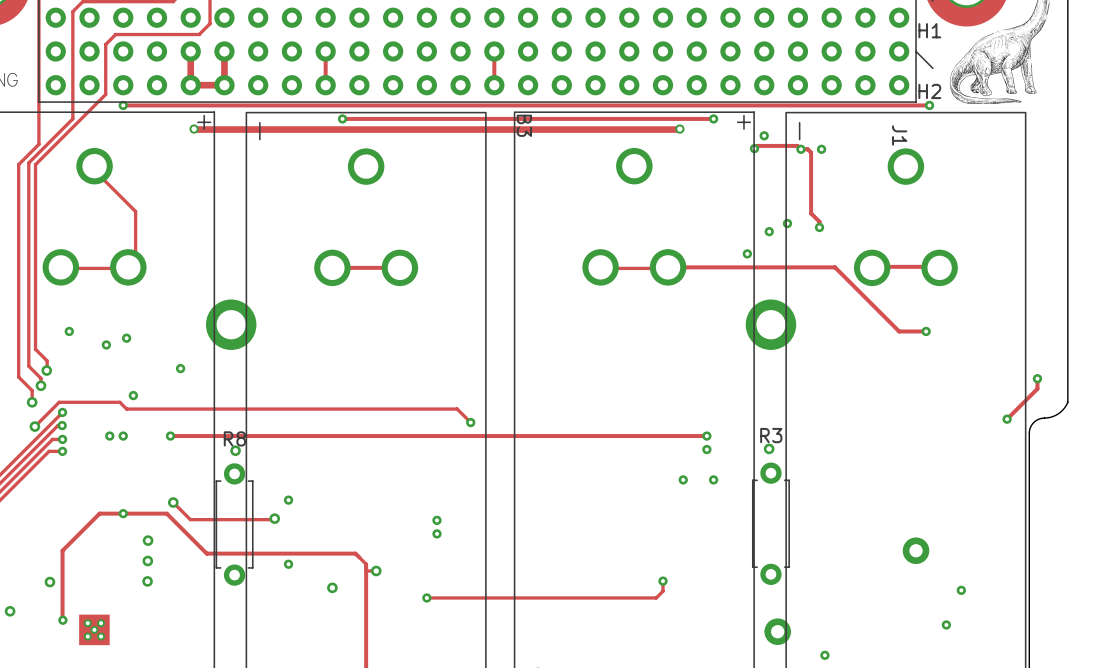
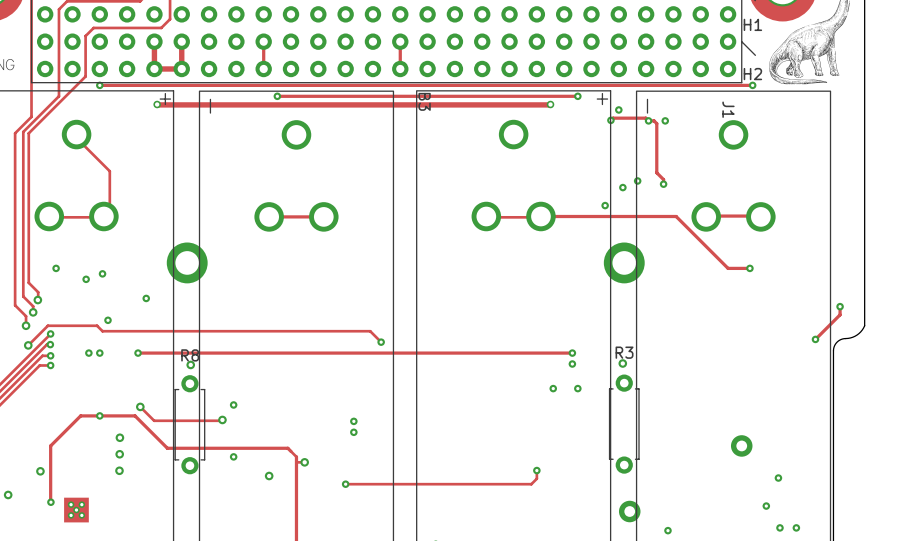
via: none -> (779, 527)
via: none -> (796, 527)

